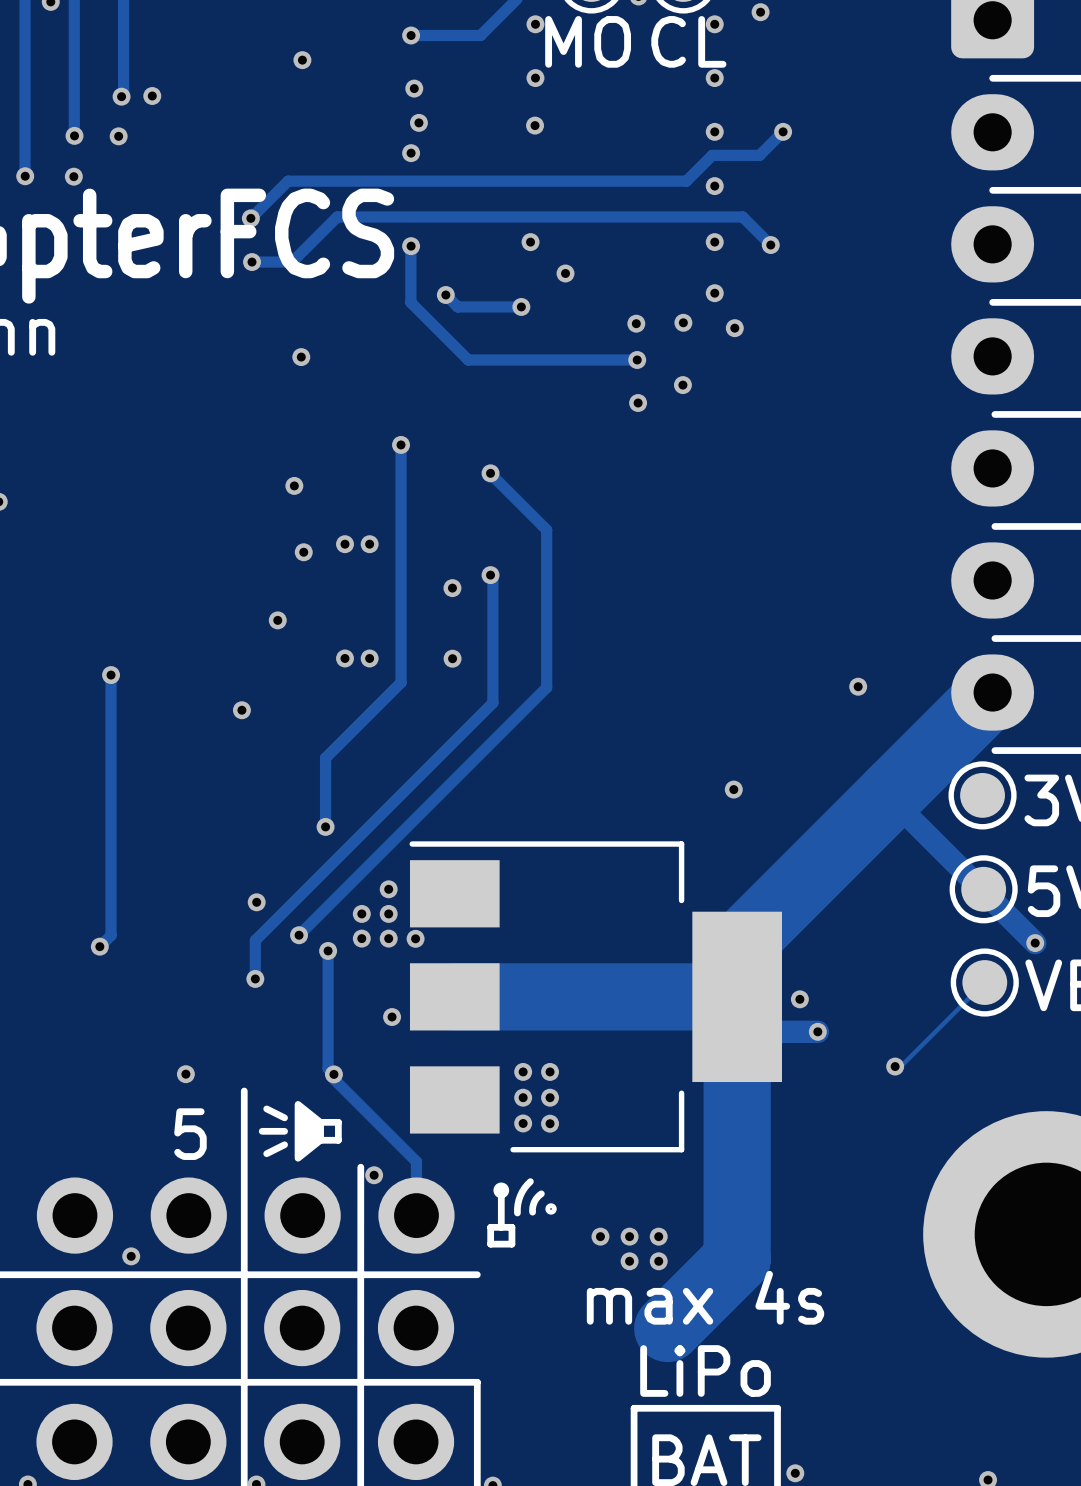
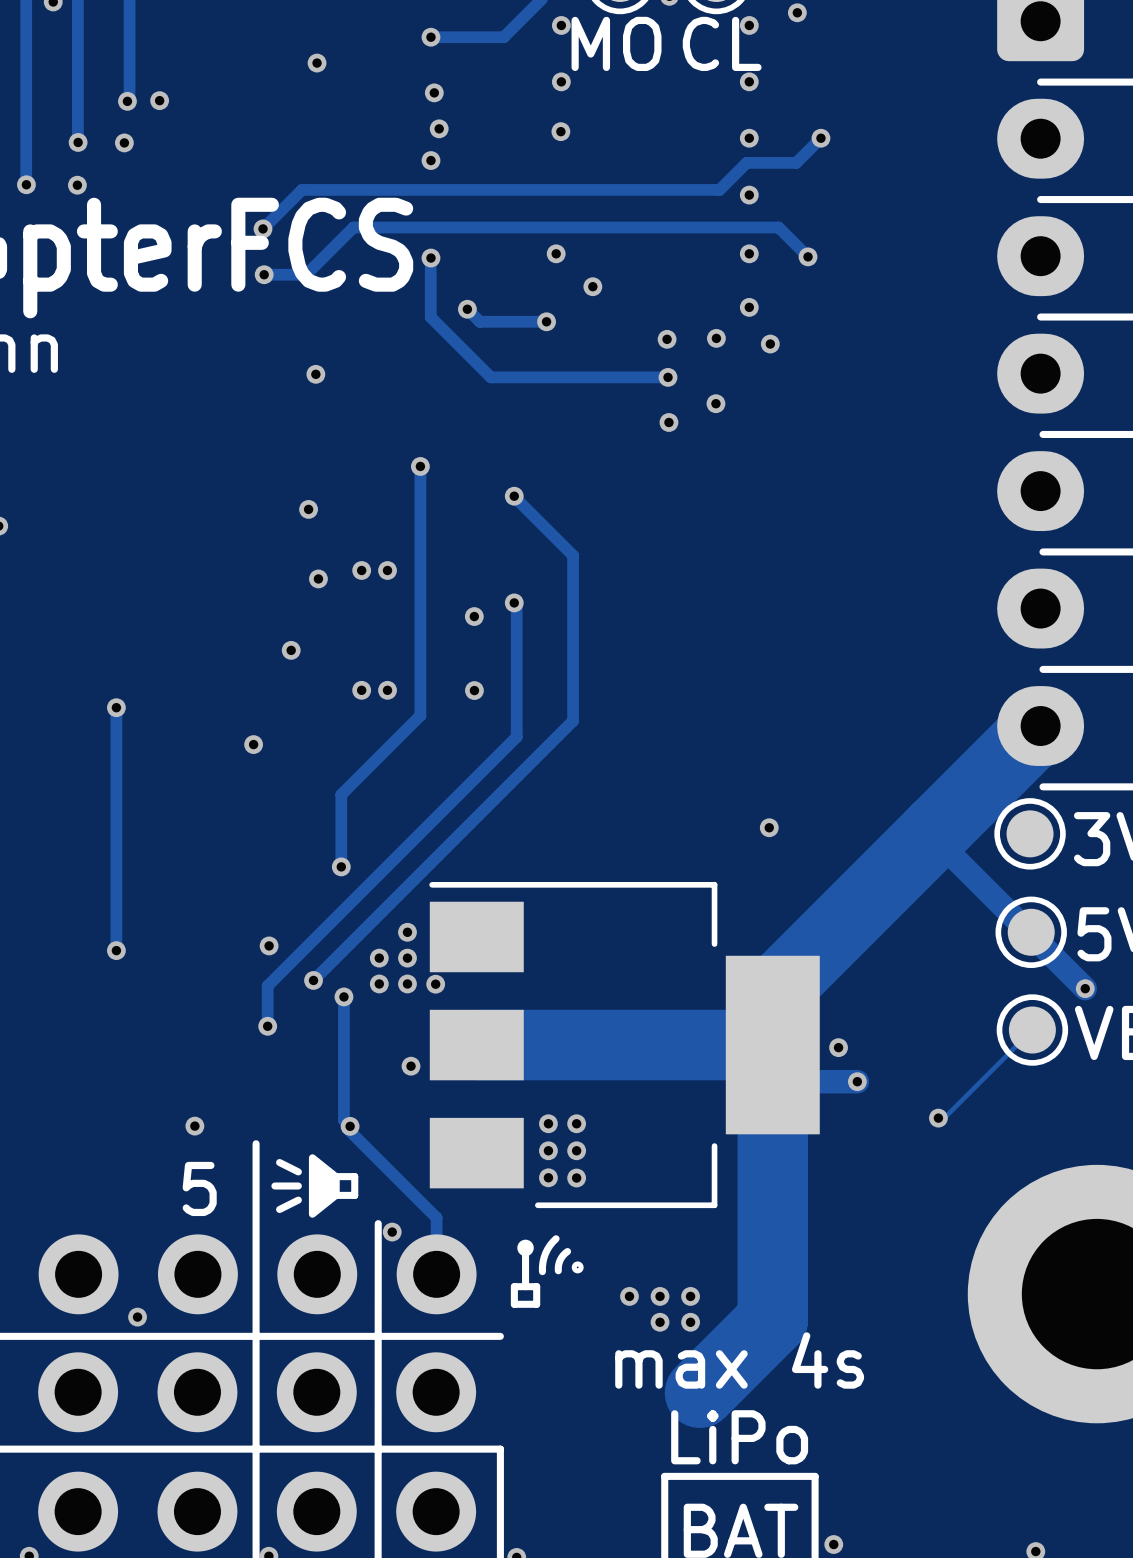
via: (858, 686) -> none
track: (111, 906) (111, 935) (99, 946) -> none
via position: (99, 946) -> (116, 950)

